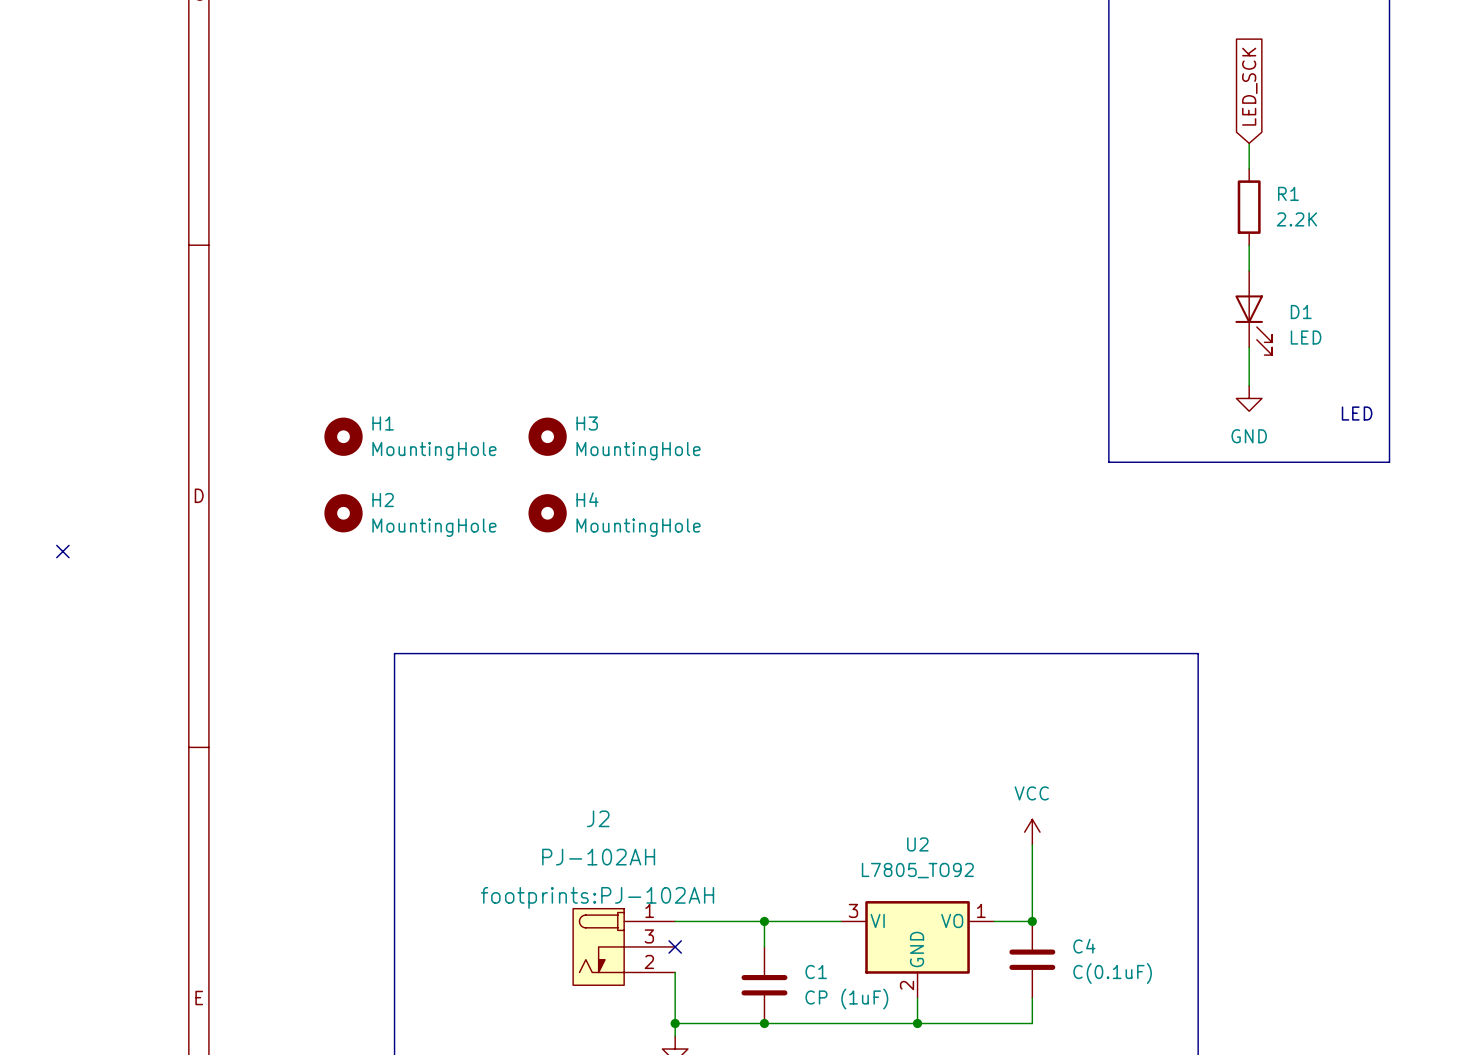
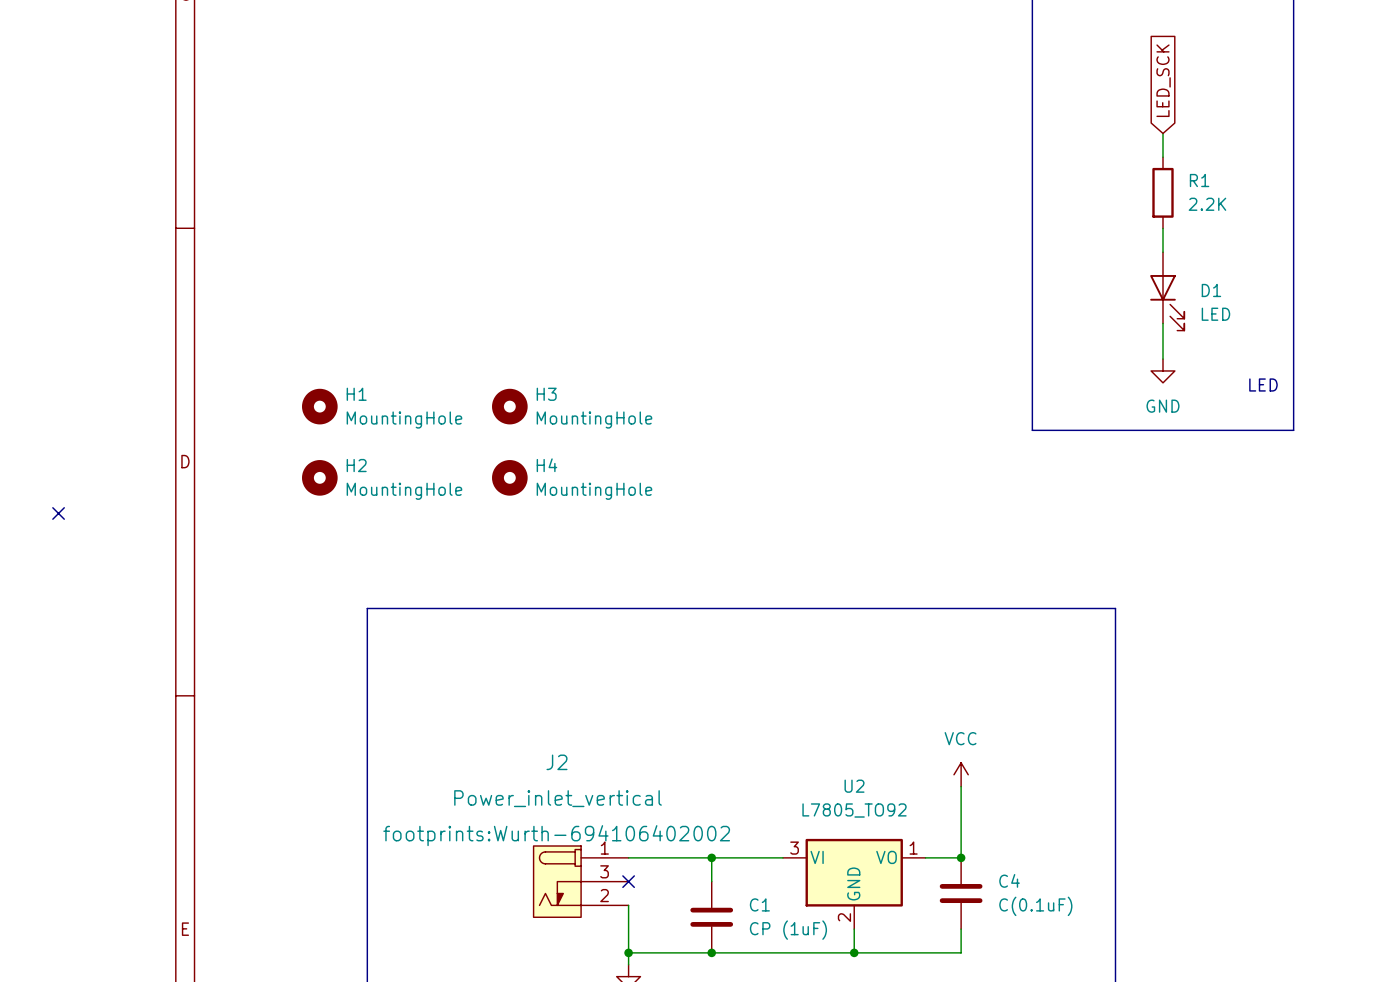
J2 value: PJ-102AH (598, 857) -> Power_inlet_vertical (558, 798)
J2 text: footprints:PJ-102AH (597, 897) -> footprints:Wurth-694106402002 (556, 835)

